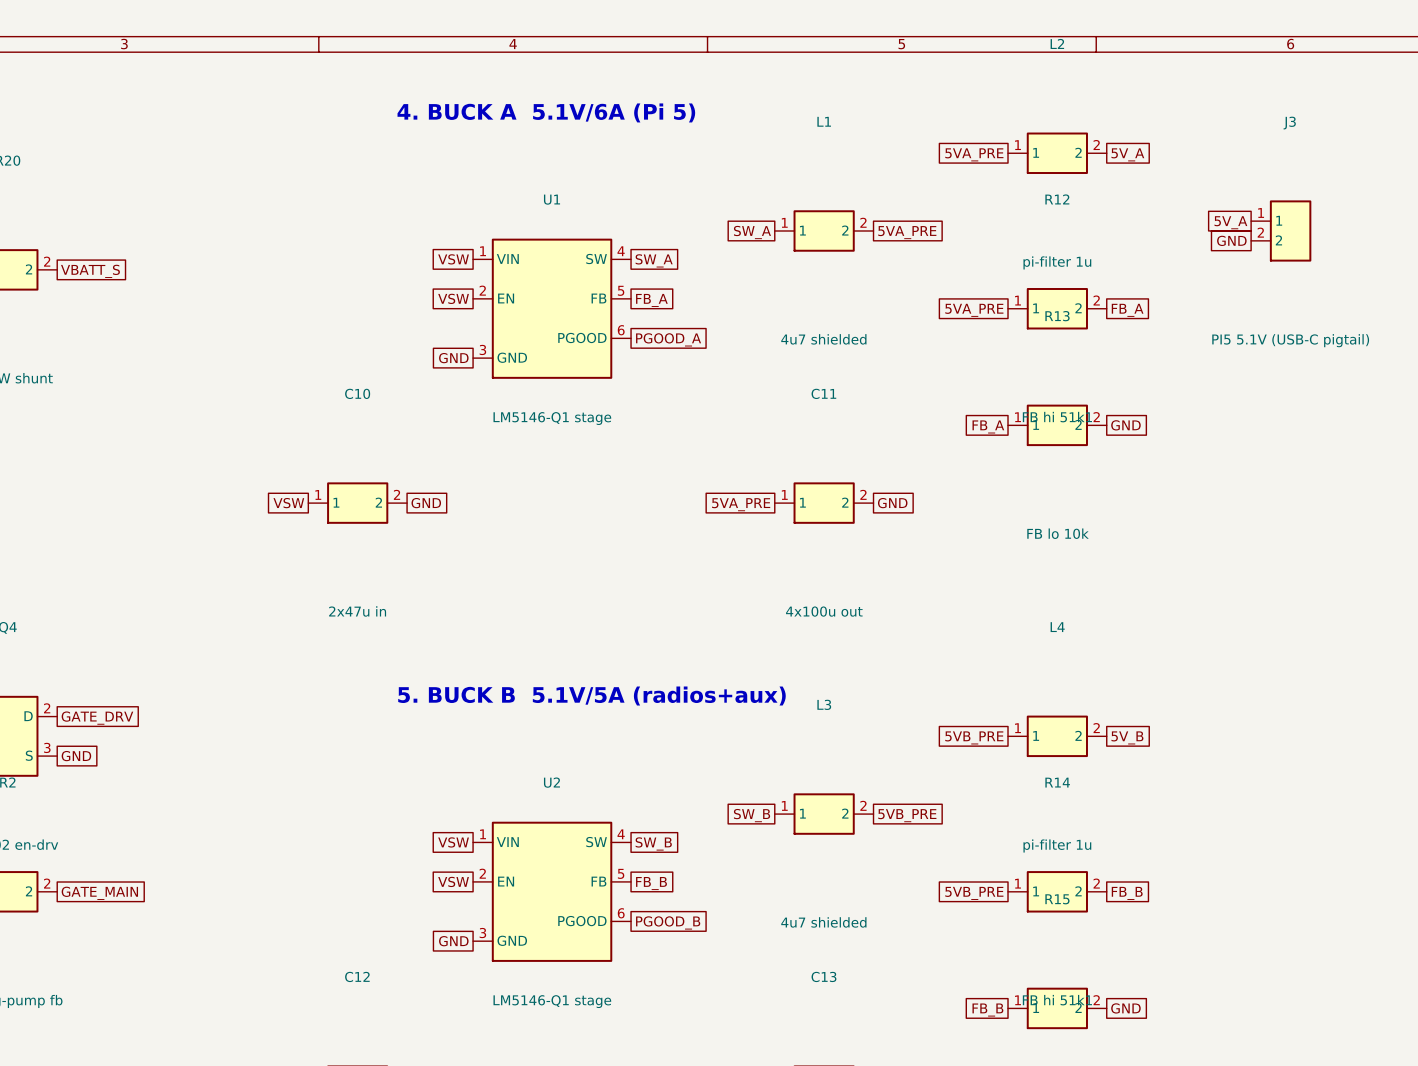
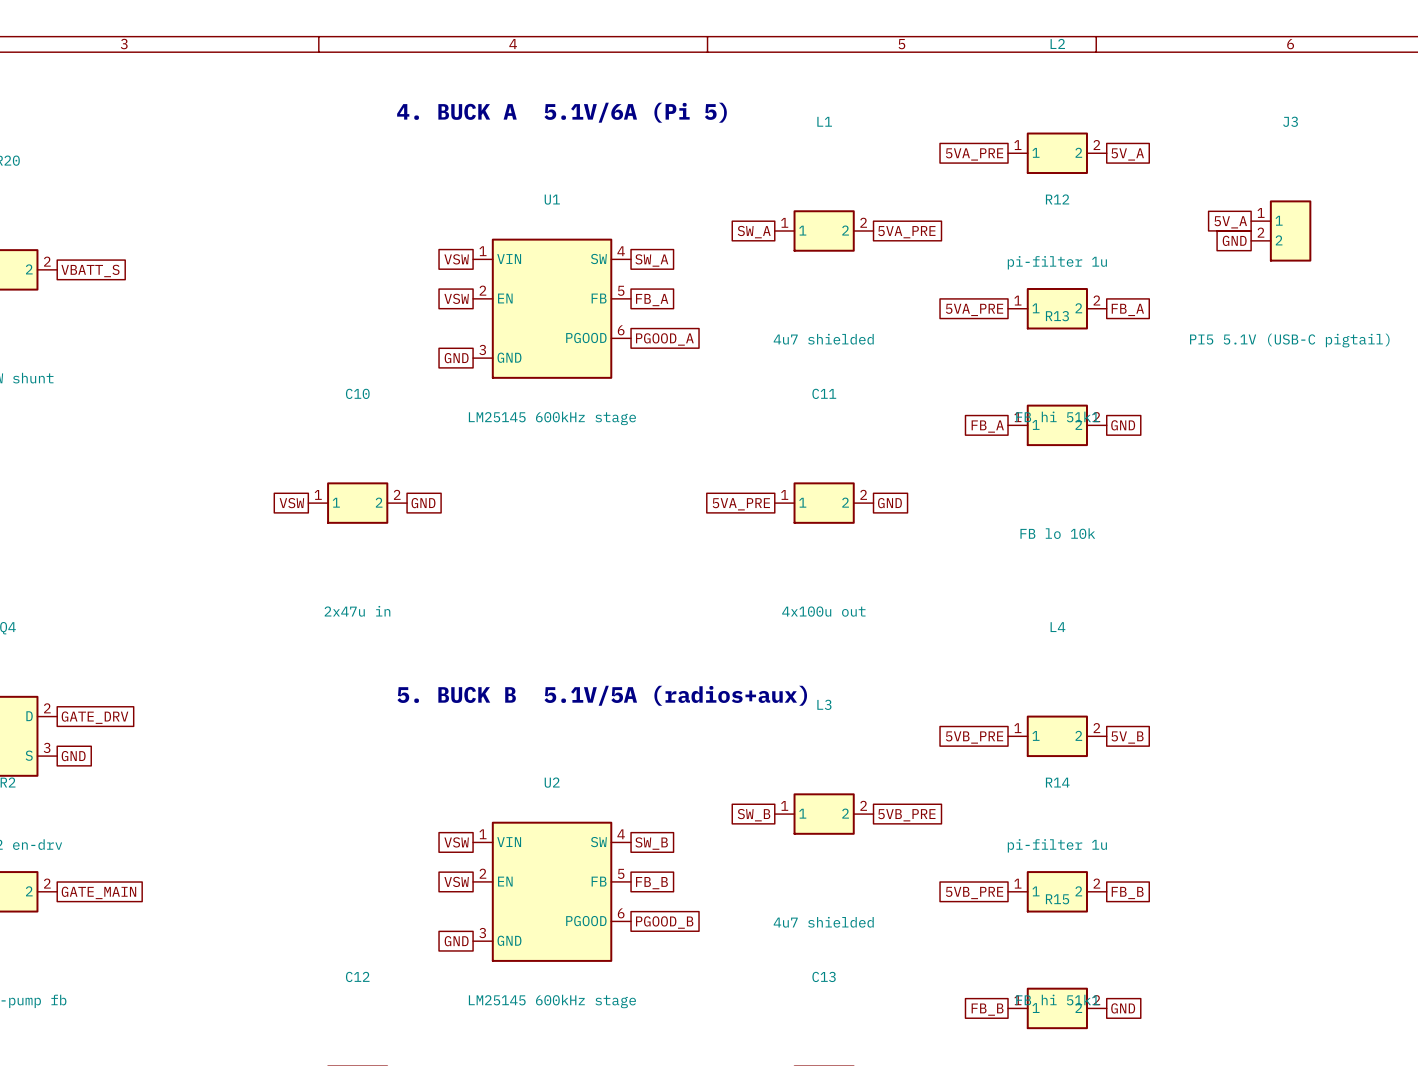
U1 value: LM5146-Q1 stage (552, 418) -> LM25145 600kHz stage (552, 418)
U2 value: LM5146-Q1 stage (552, 1001) -> LM25145 600kHz stage (552, 1001)

